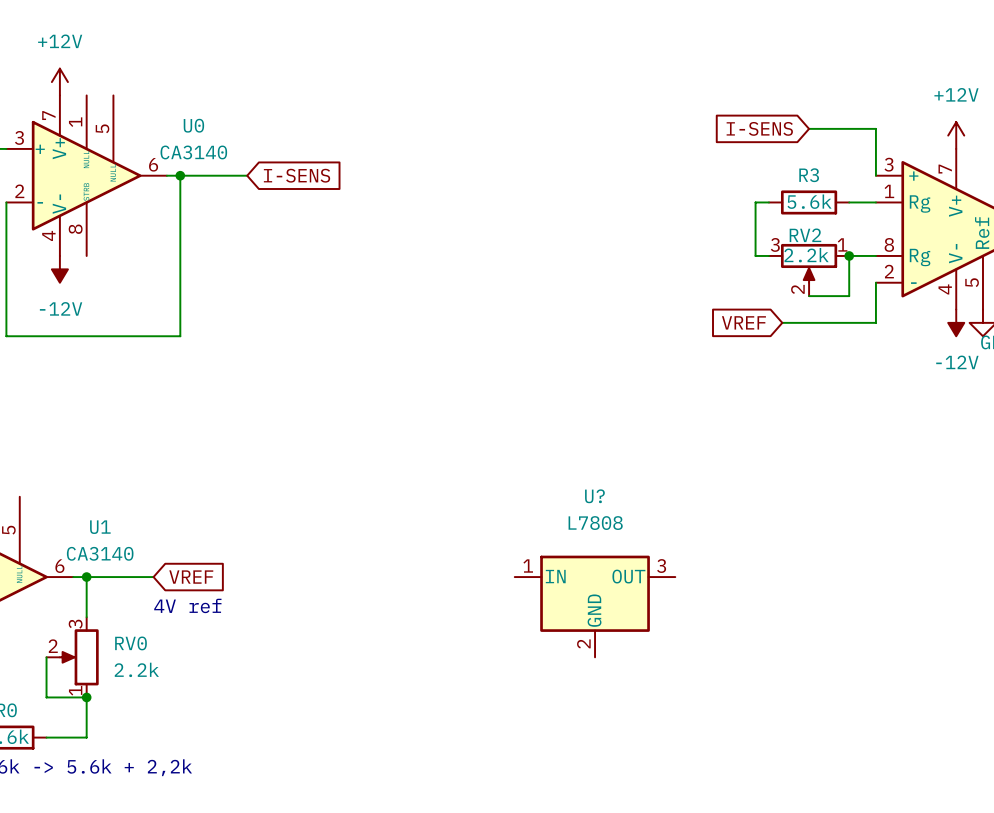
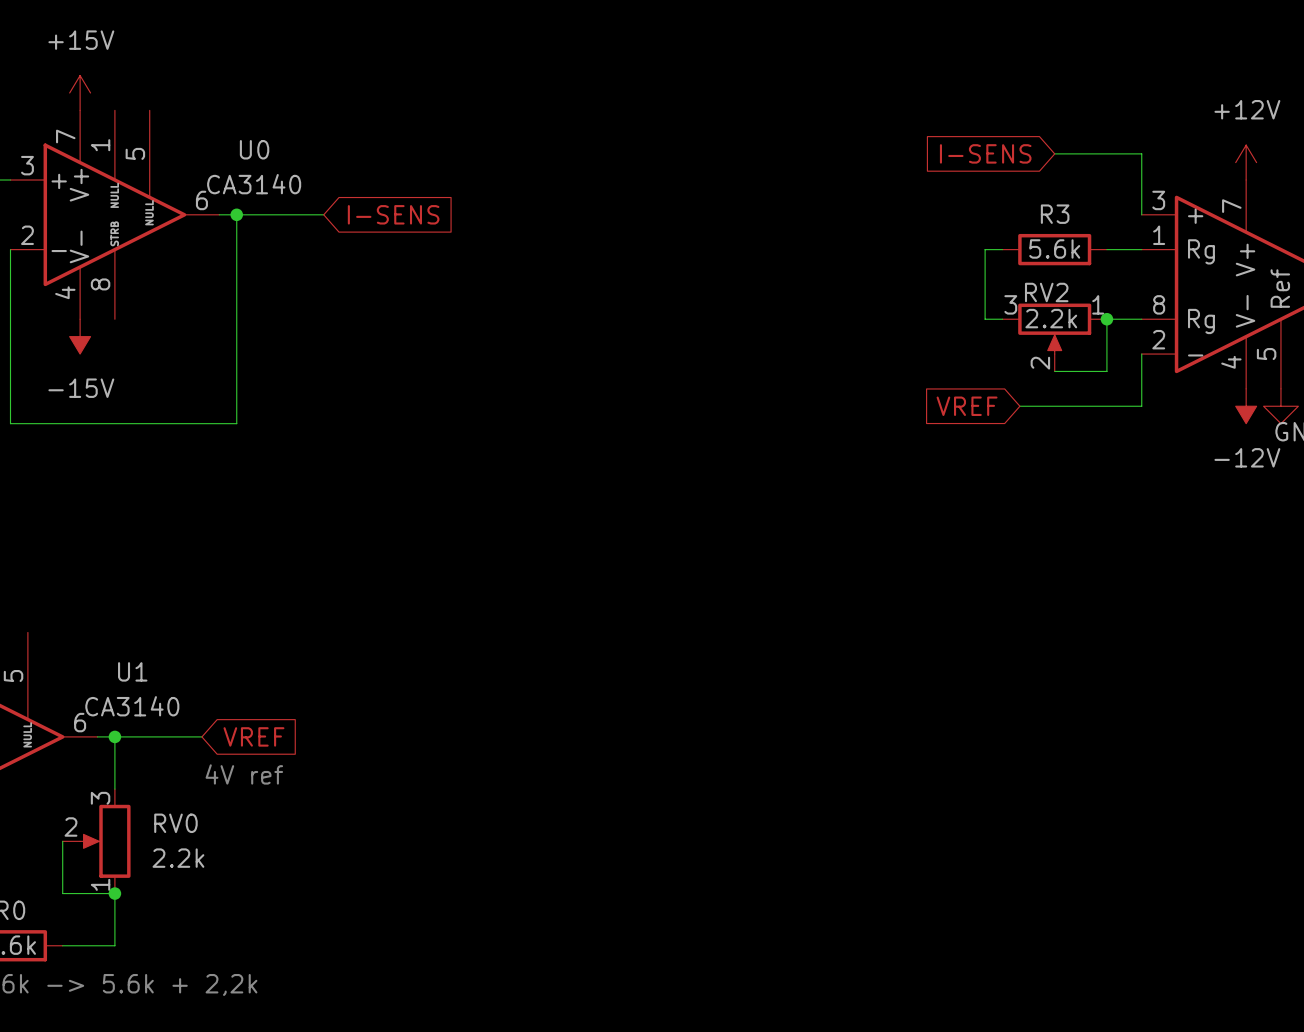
power symbol: +12V (59, 82) -> +15V (80, 92)
power symbol: -12V (59, 269) -> -15V (80, 336)
U?: L7808 (595, 606) -> none

